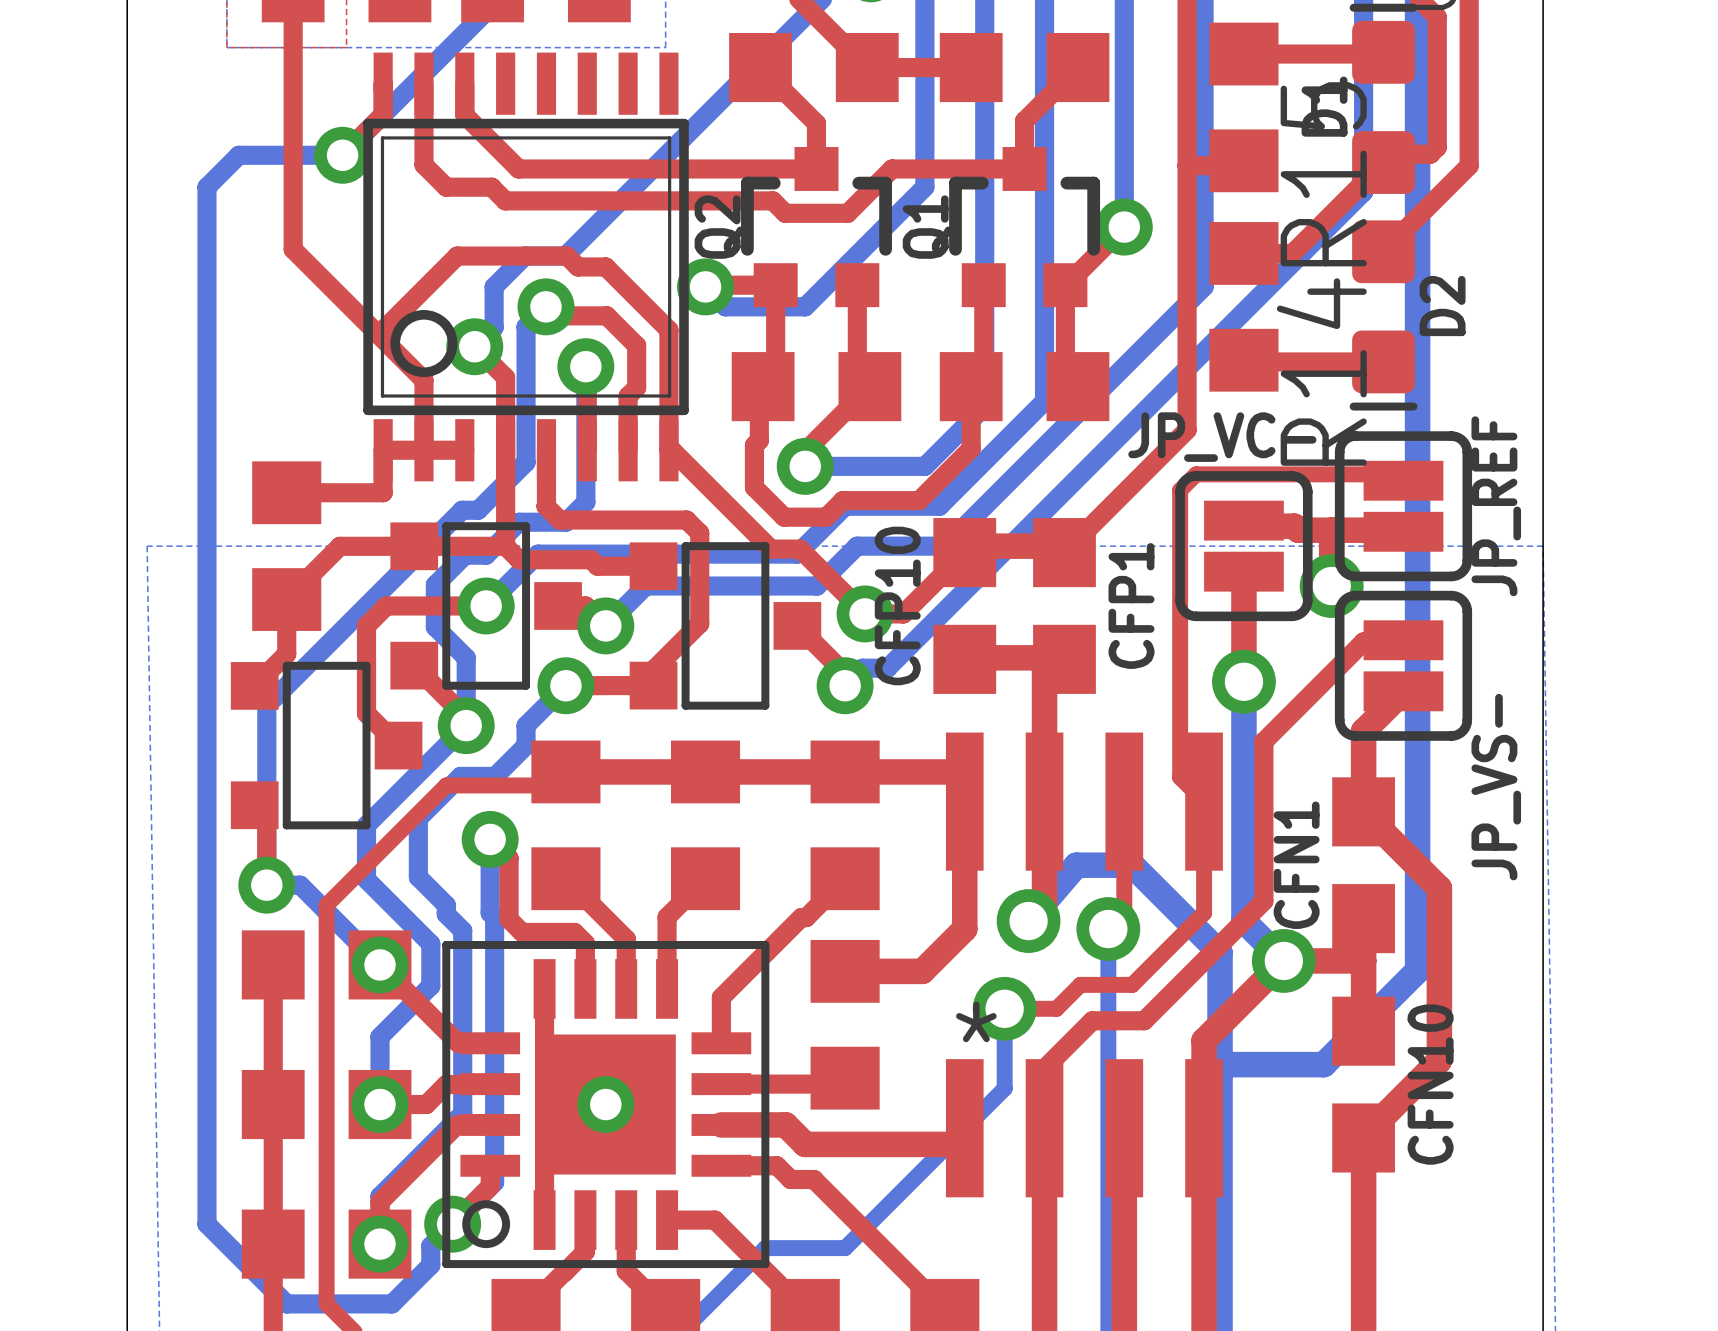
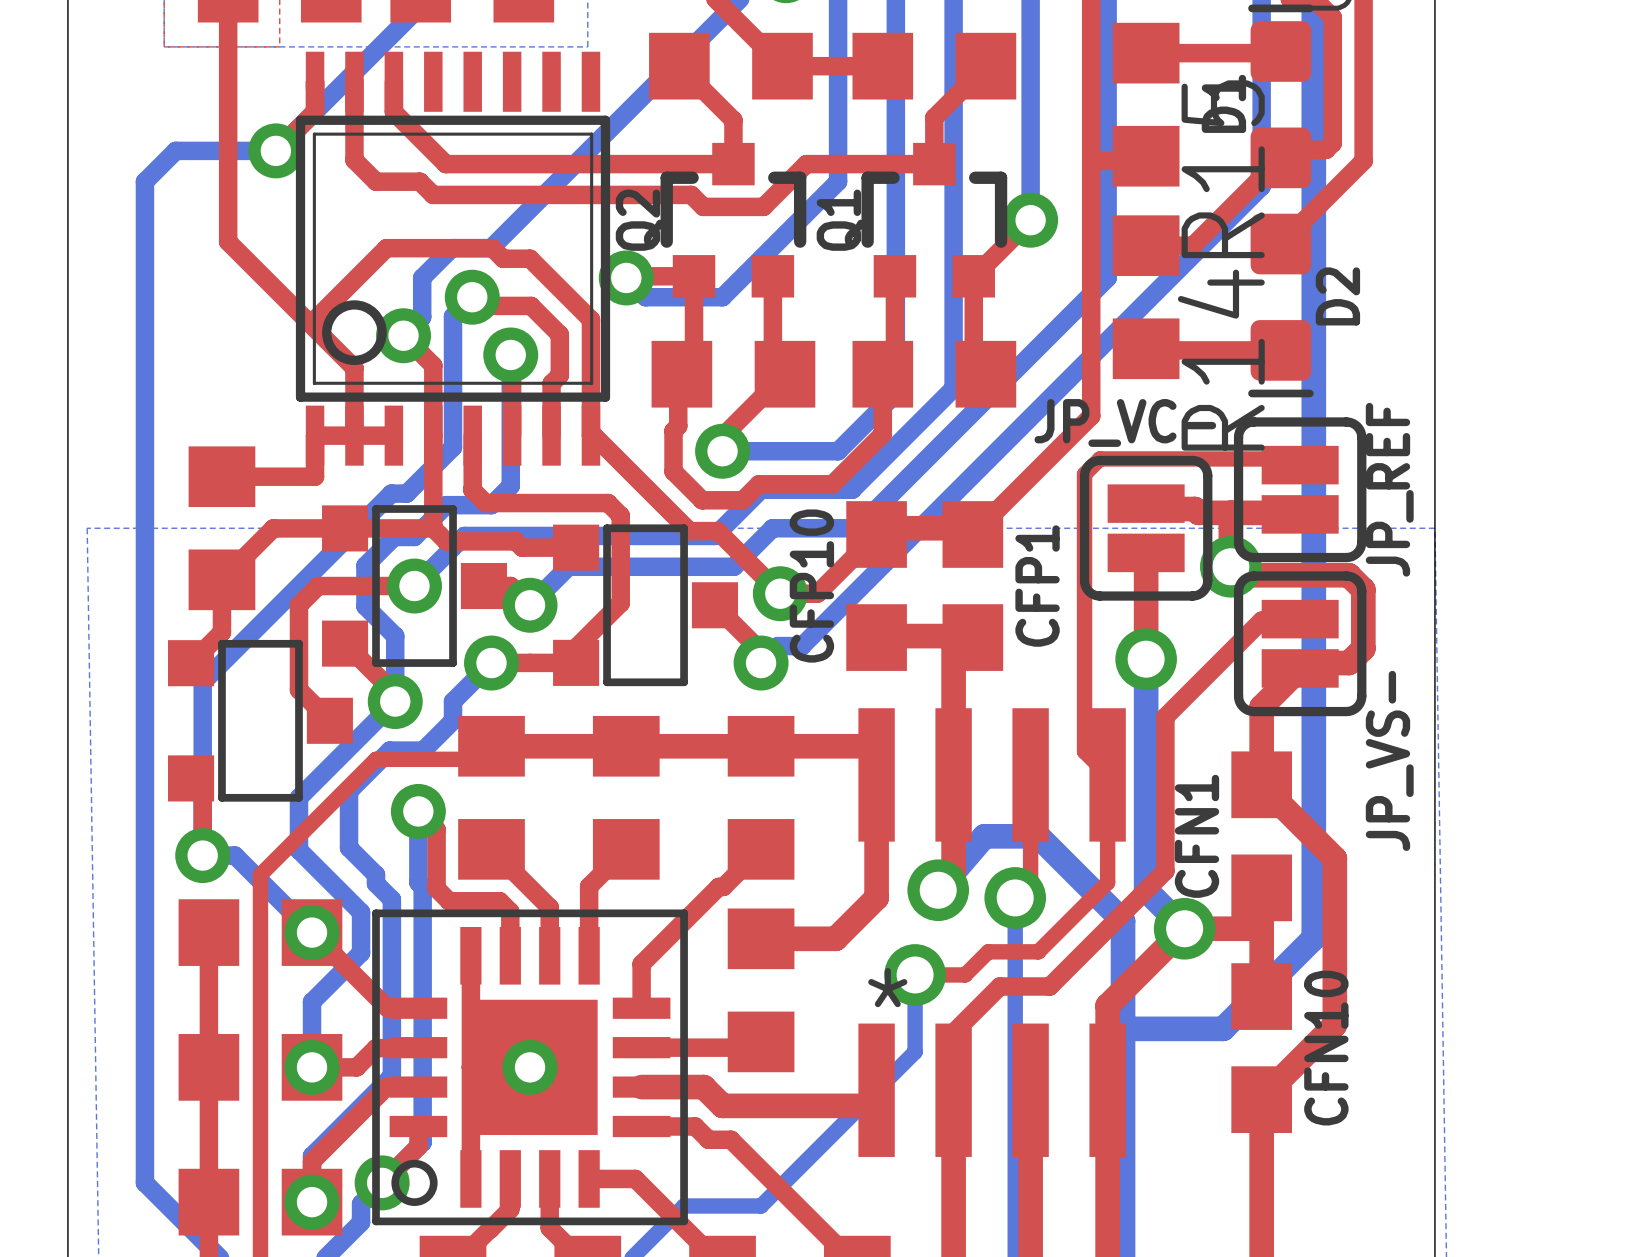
top track: none -> (1230, 566) (1239, 575) (1348, 575) (1363, 589) (1363, 648) (1348, 663) (1305, 663) (1300, 668)

